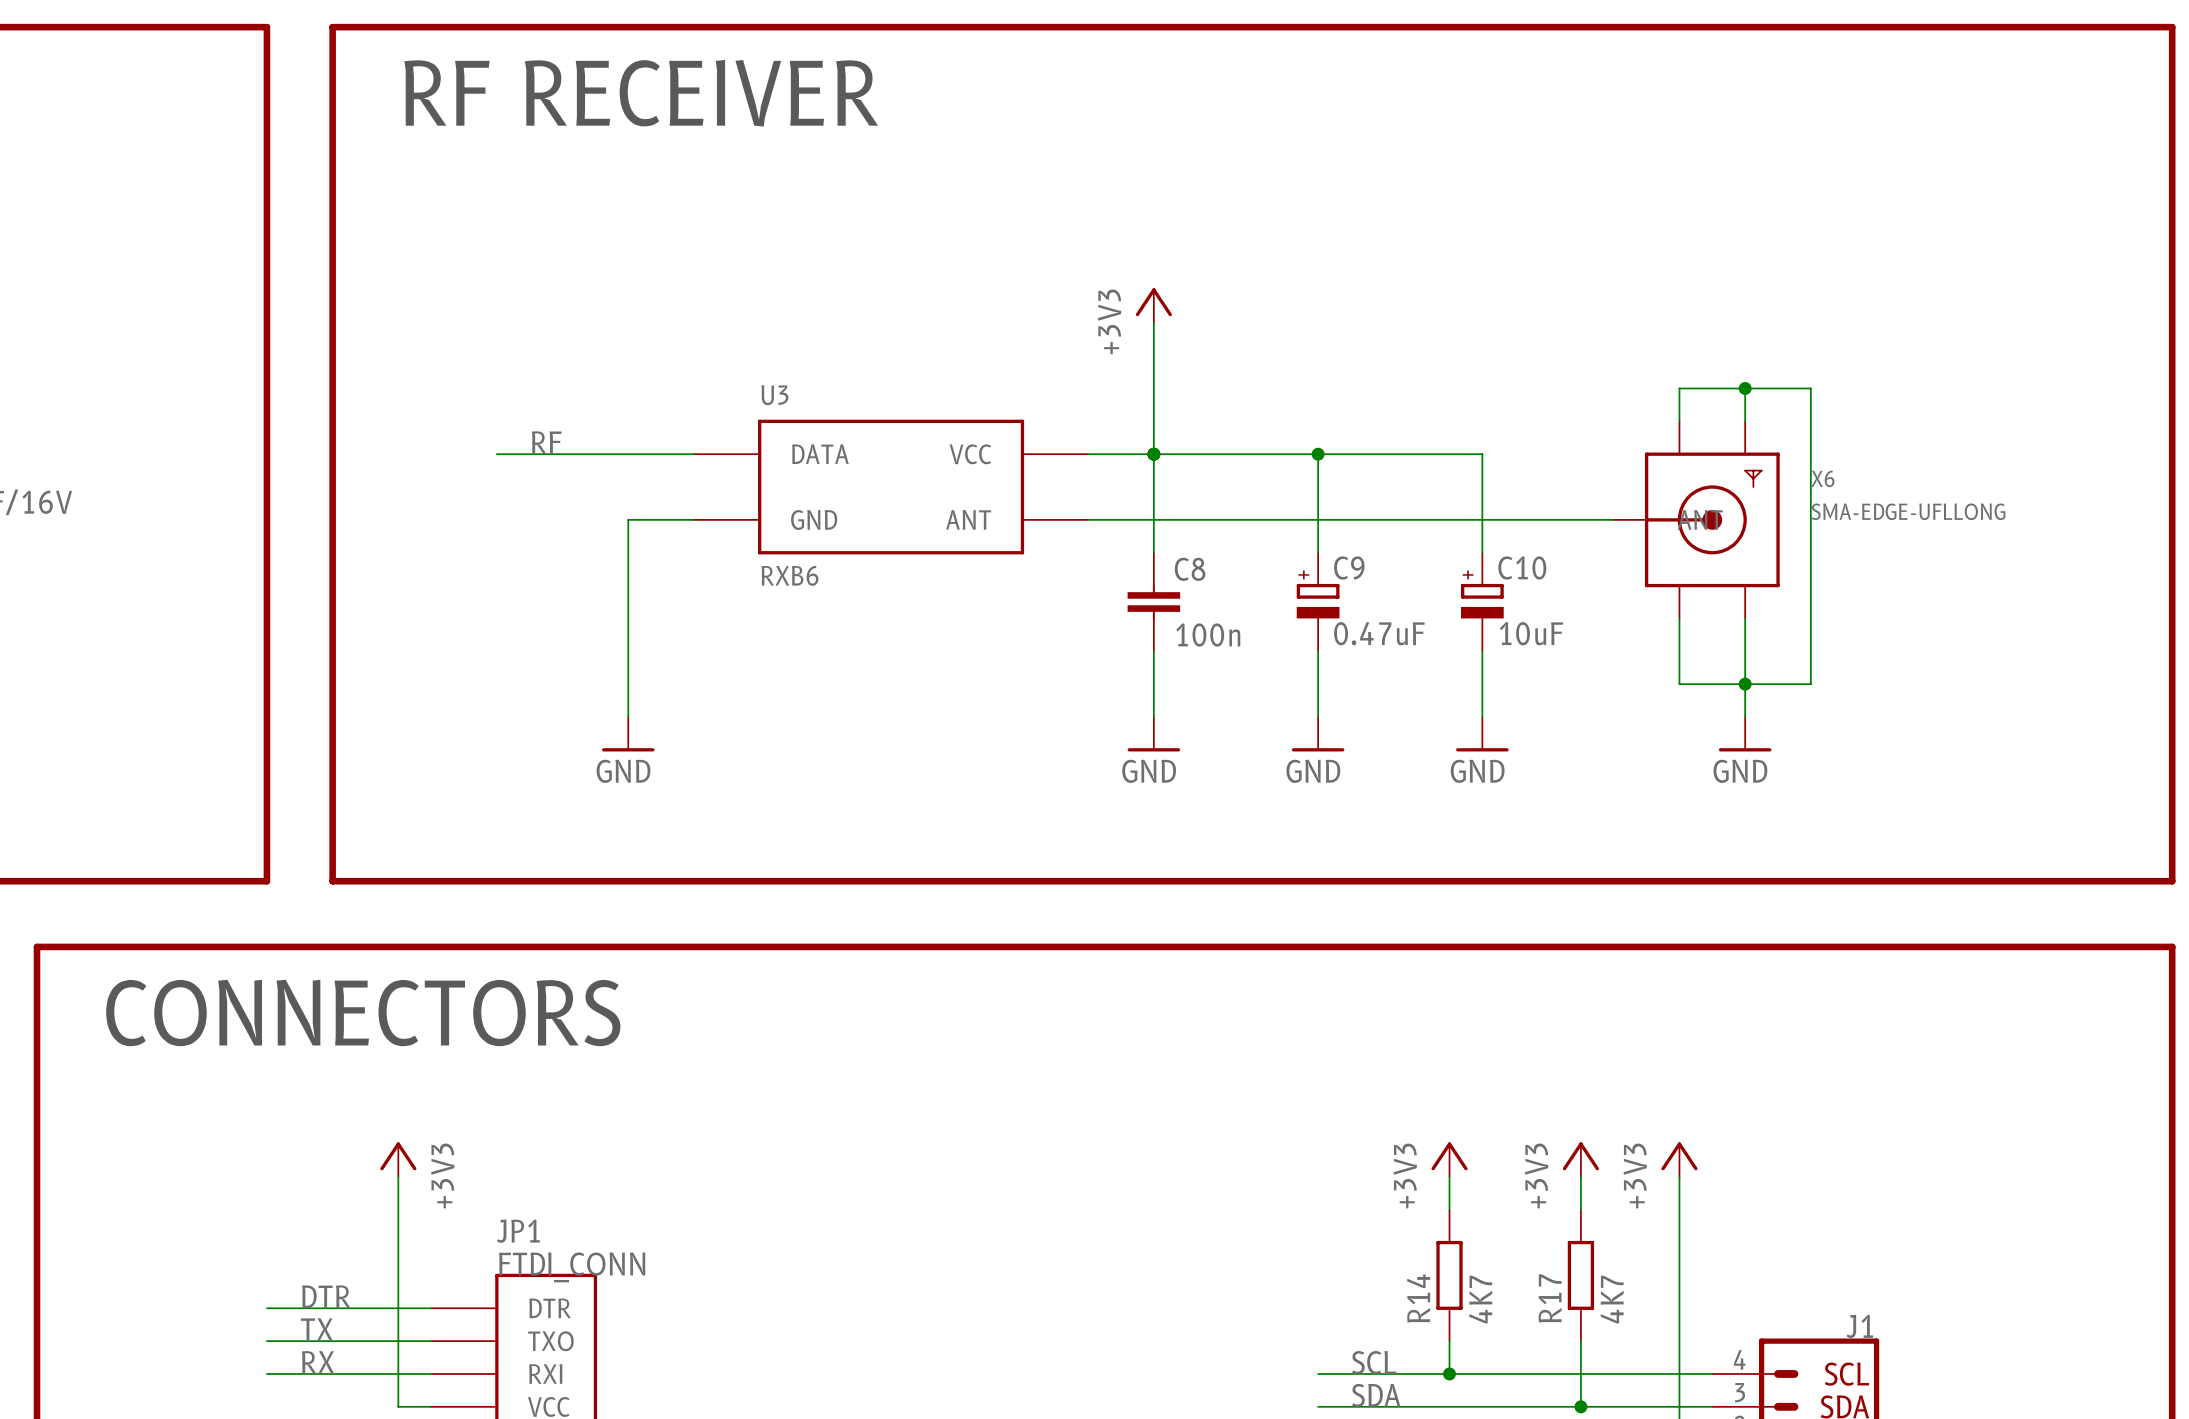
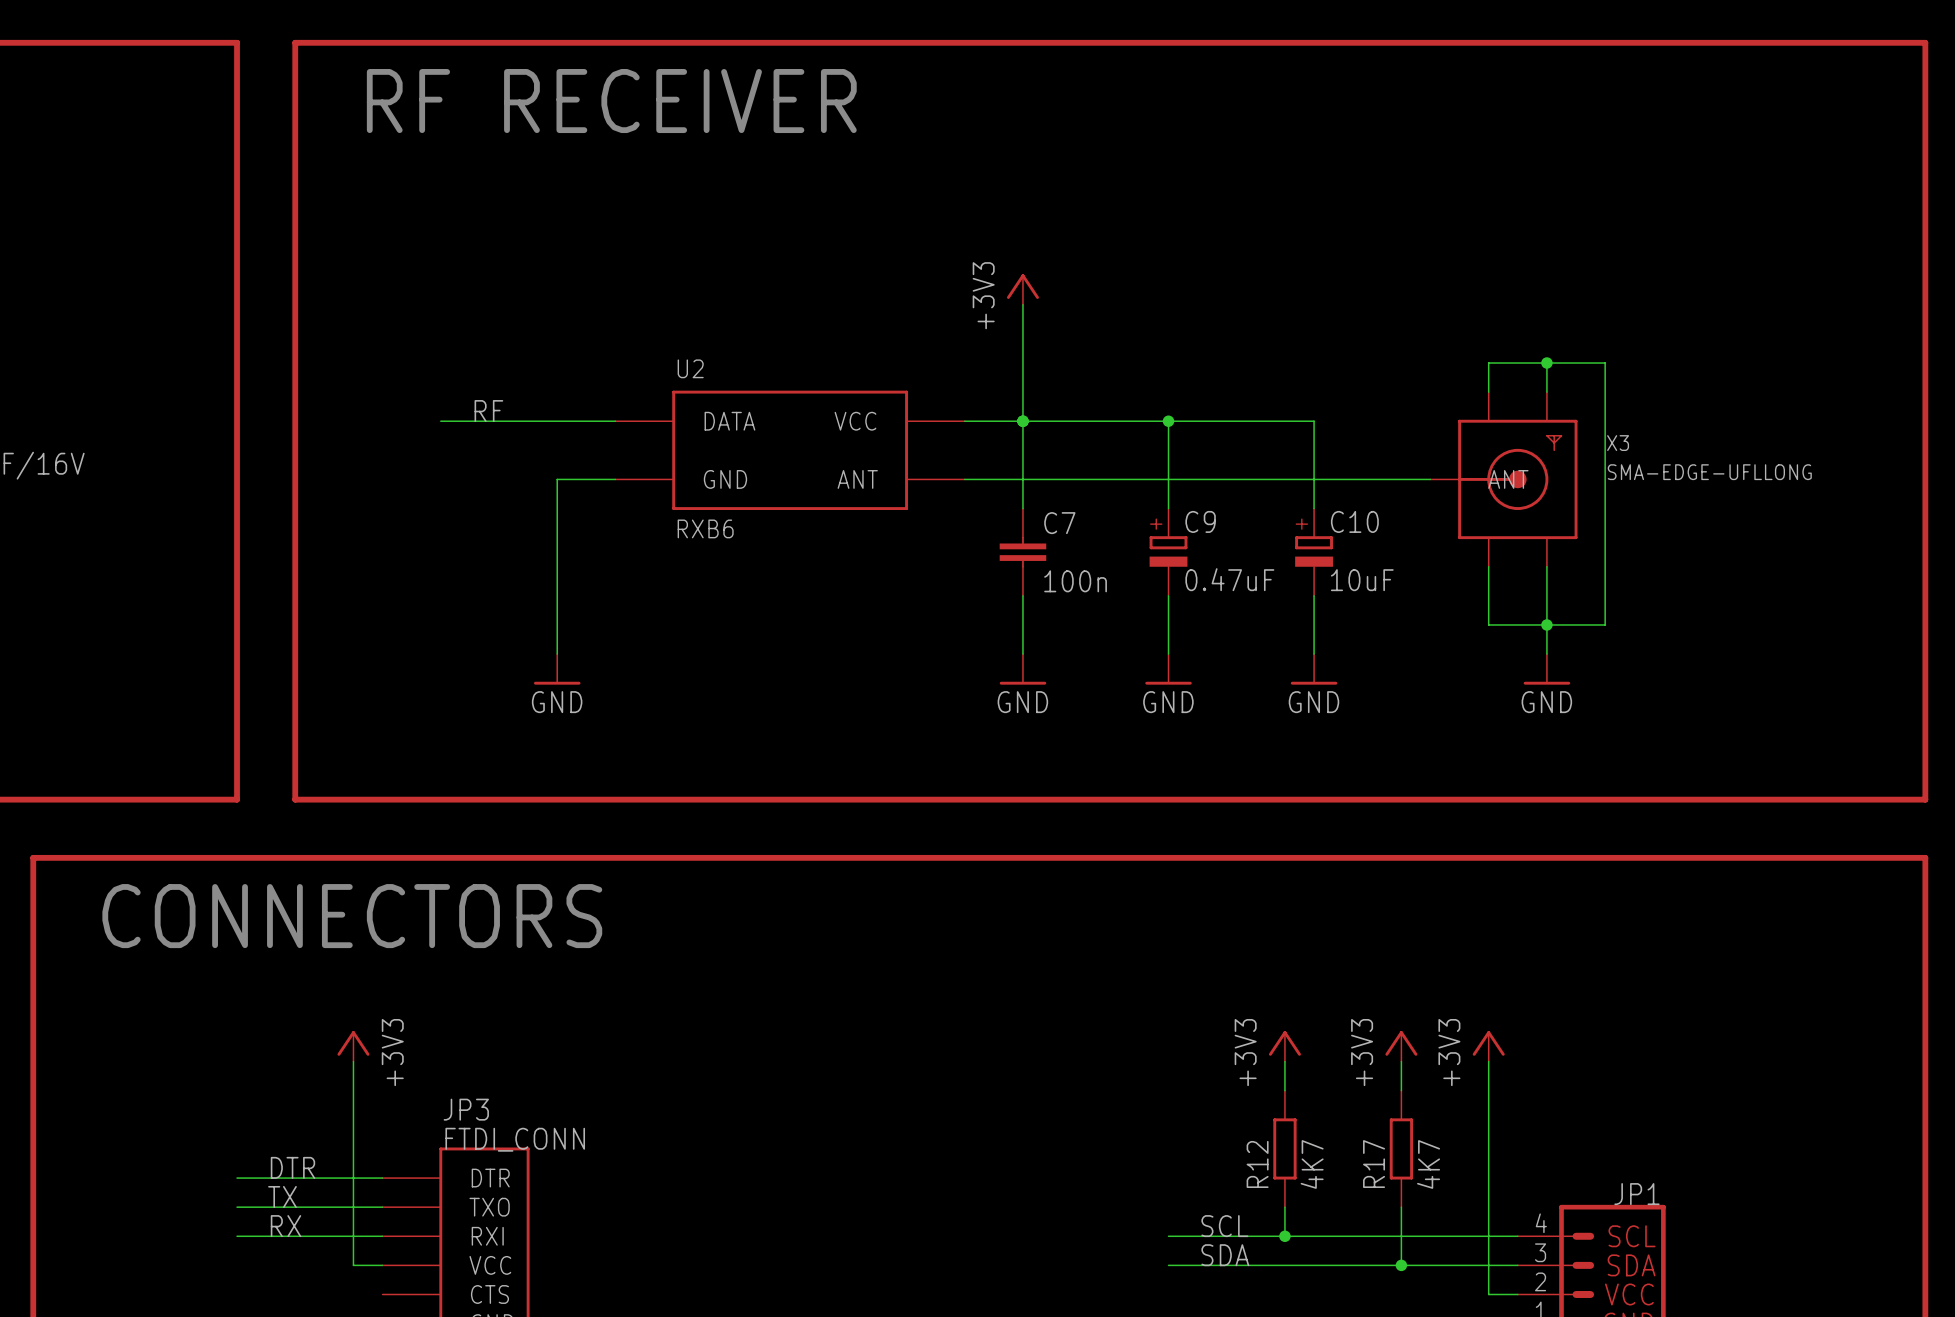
U3 name: U3 (774, 395) -> U2 (690, 368)
X6 name: X6 (1822, 478) -> X3 (1618, 443)
C8 name: C8 (1190, 569) -> C7 (1059, 523)
JP1 name: JP1 (518, 1231) -> JP3 (466, 1109)
R14 name: R14 (1418, 1298) -> R12 (1257, 1164)
J1 name: J1 (1859, 1326) -> JP1 (1636, 1194)

